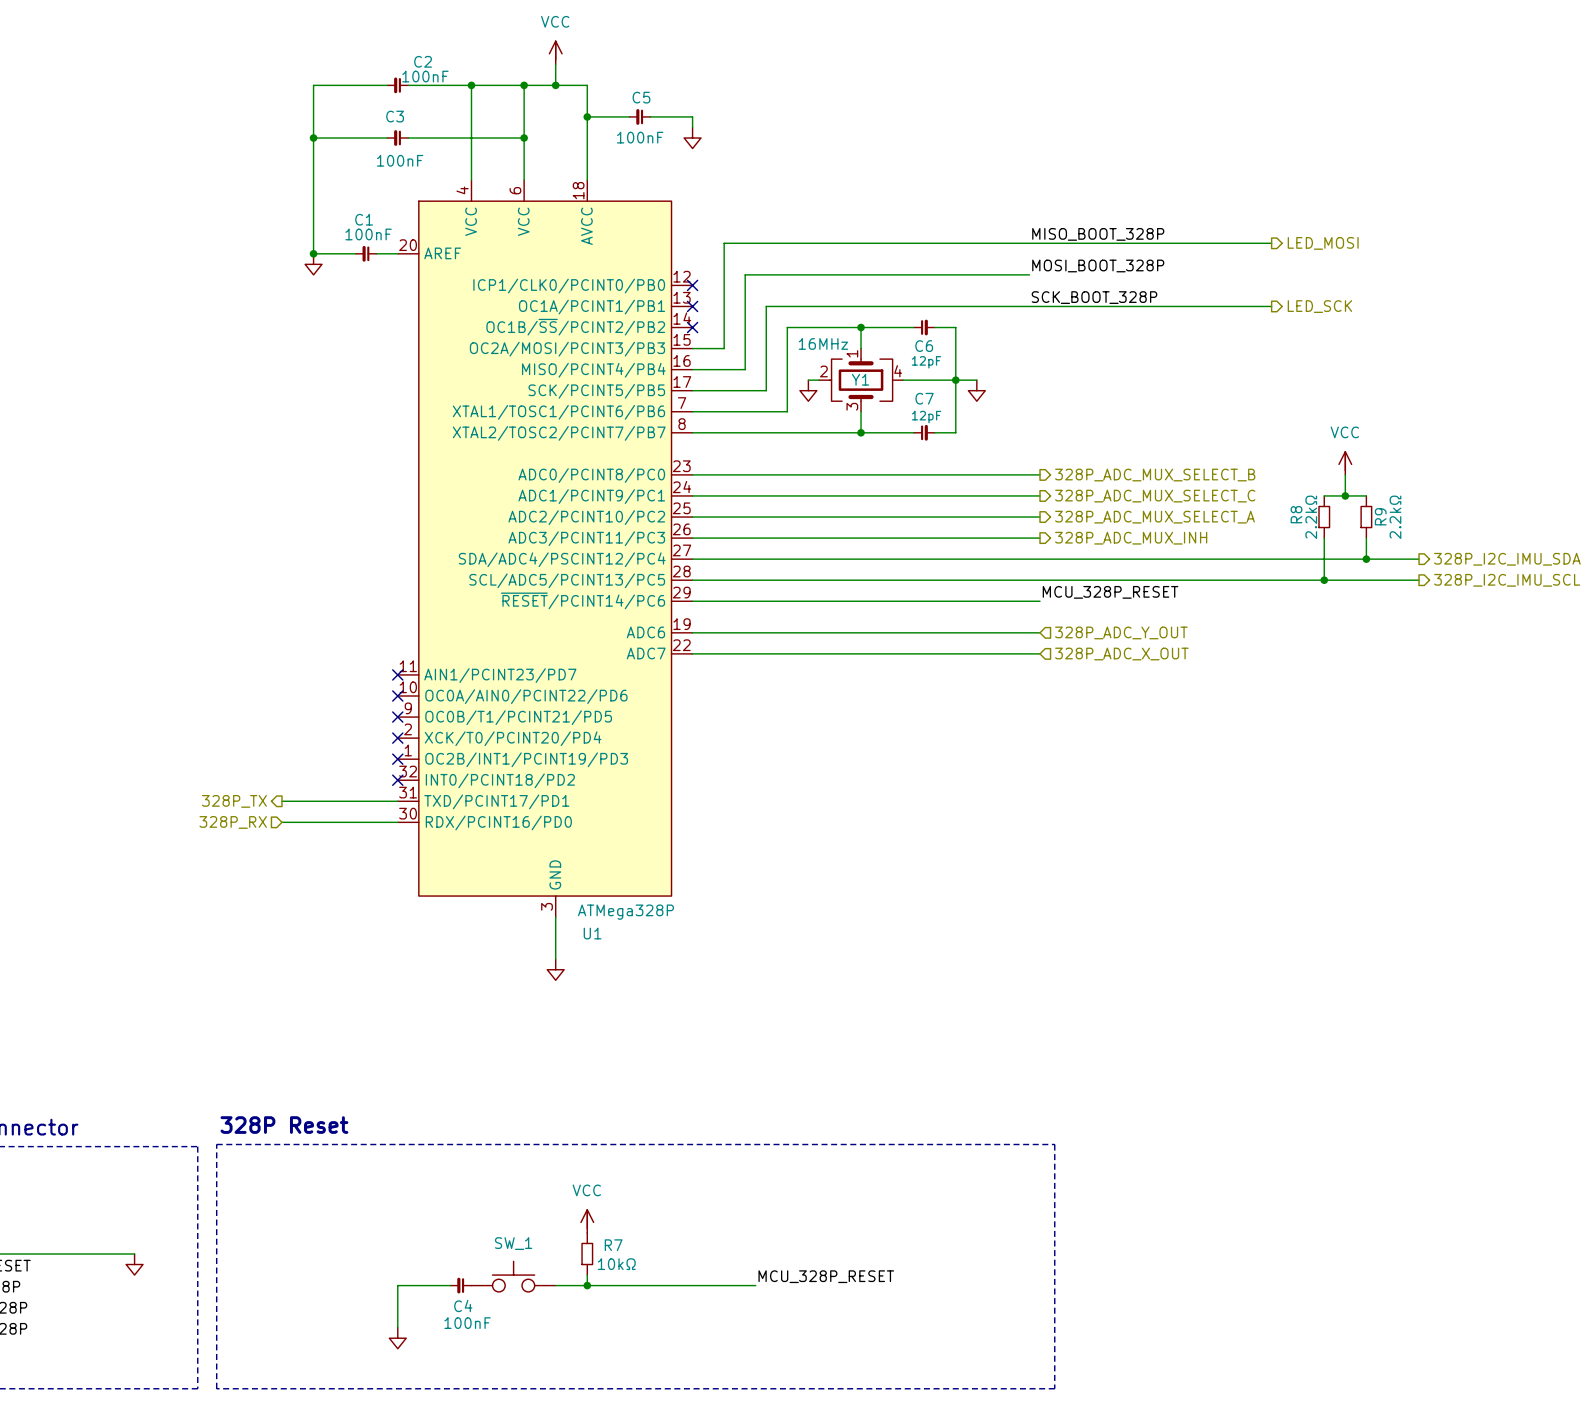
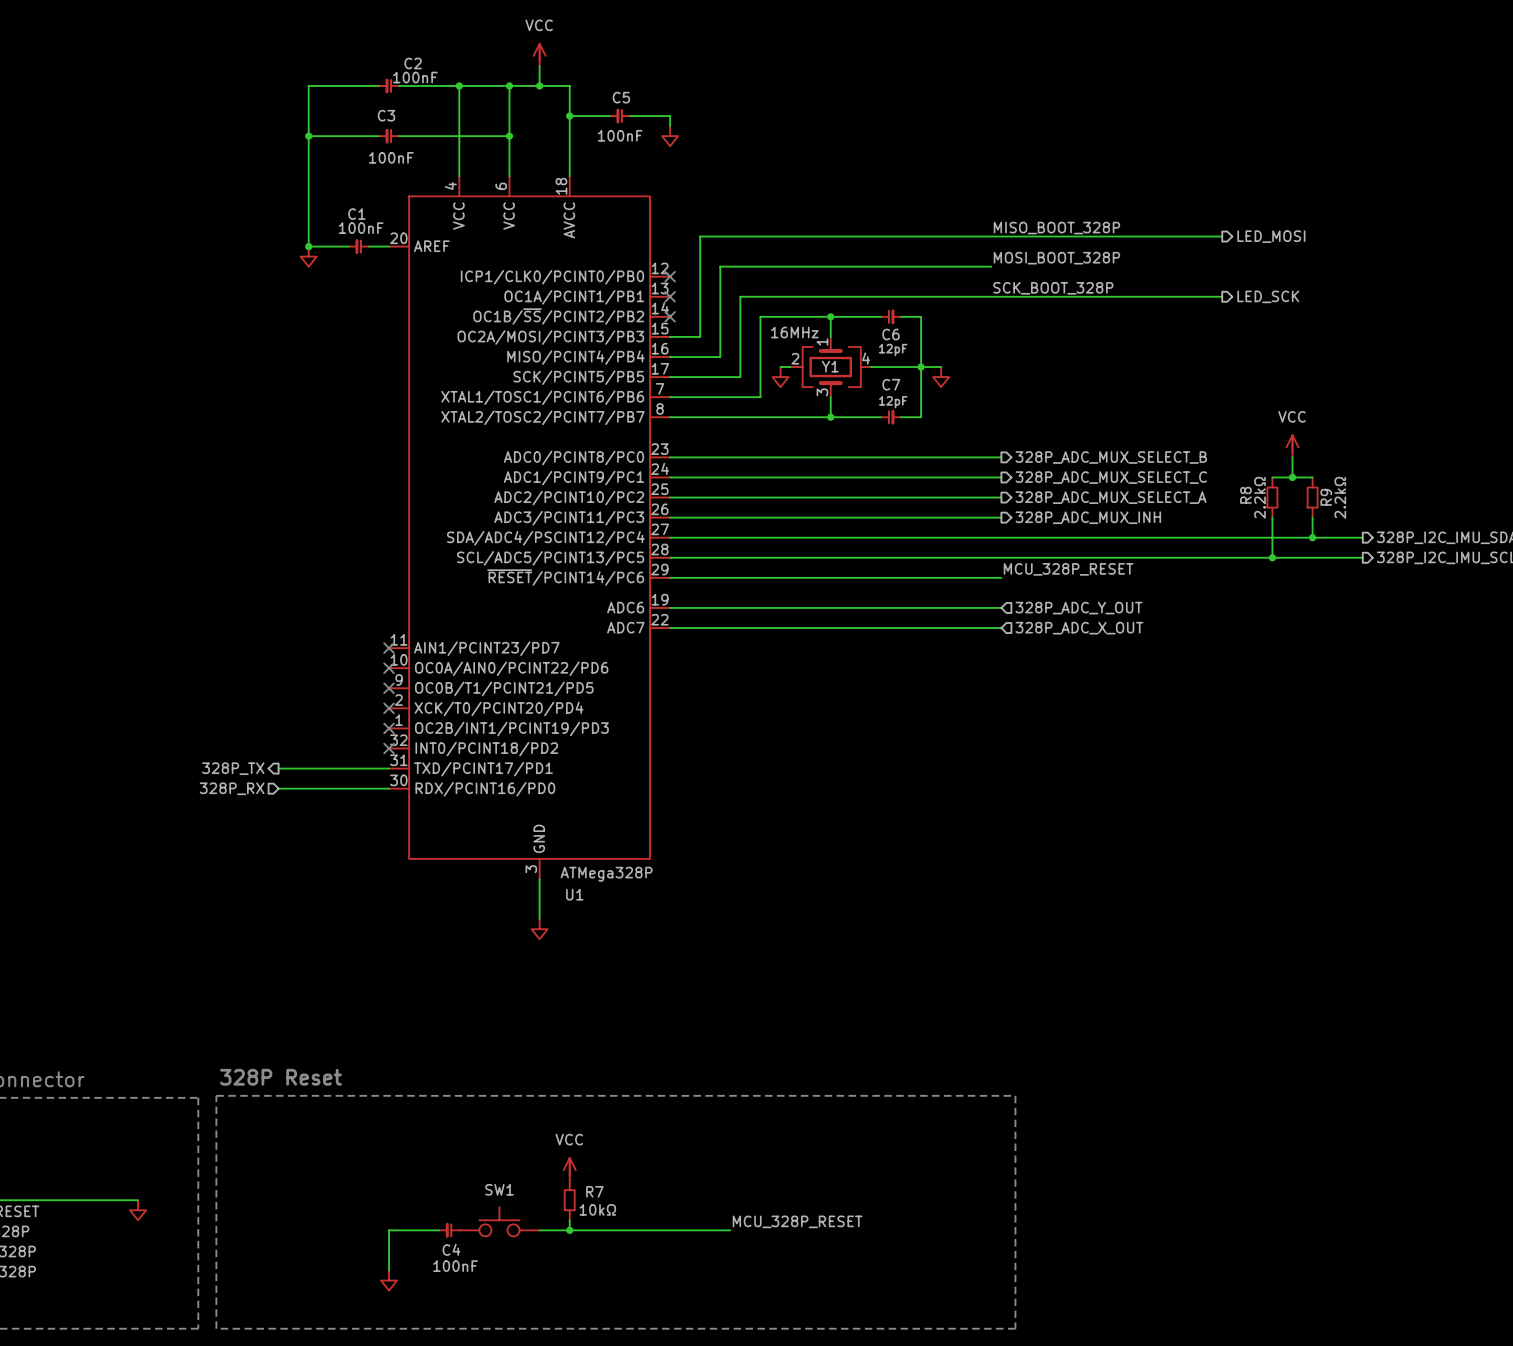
SW_1 name: SW_1 (513, 1243) -> SW1 (499, 1189)

